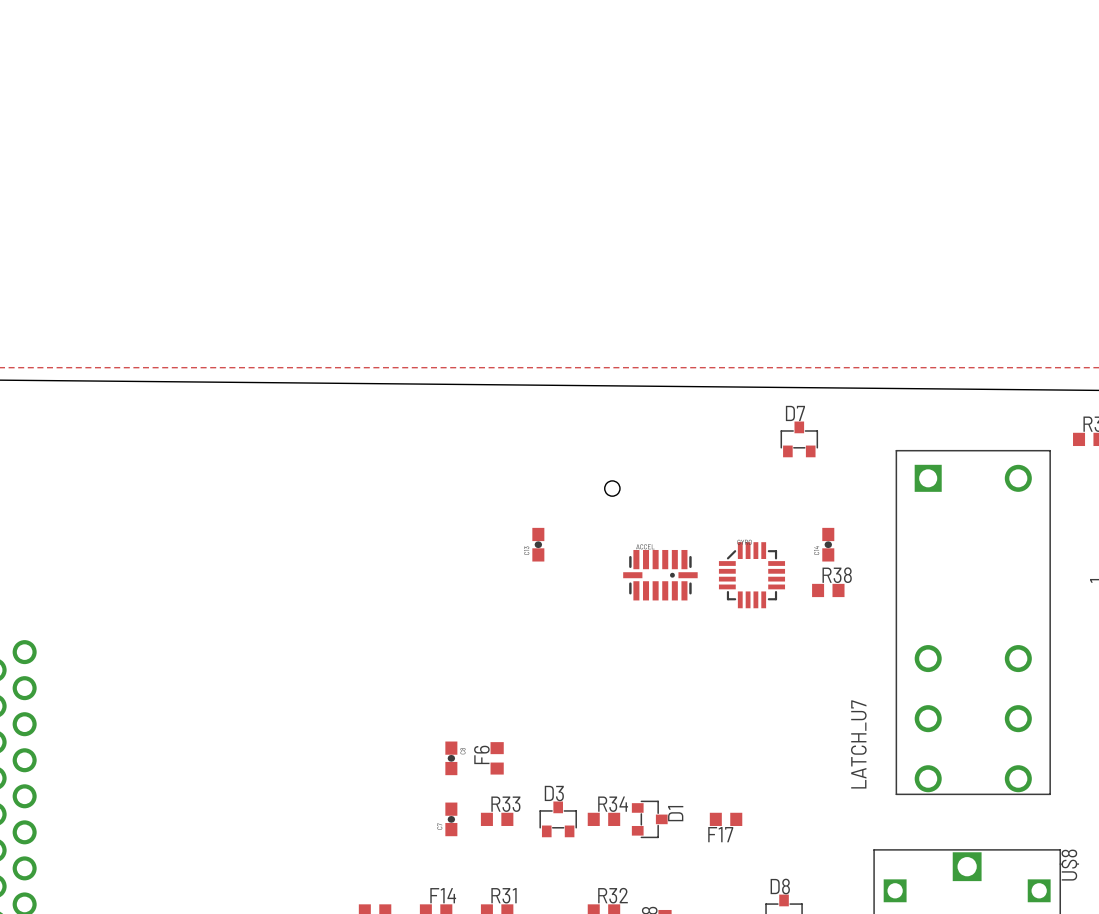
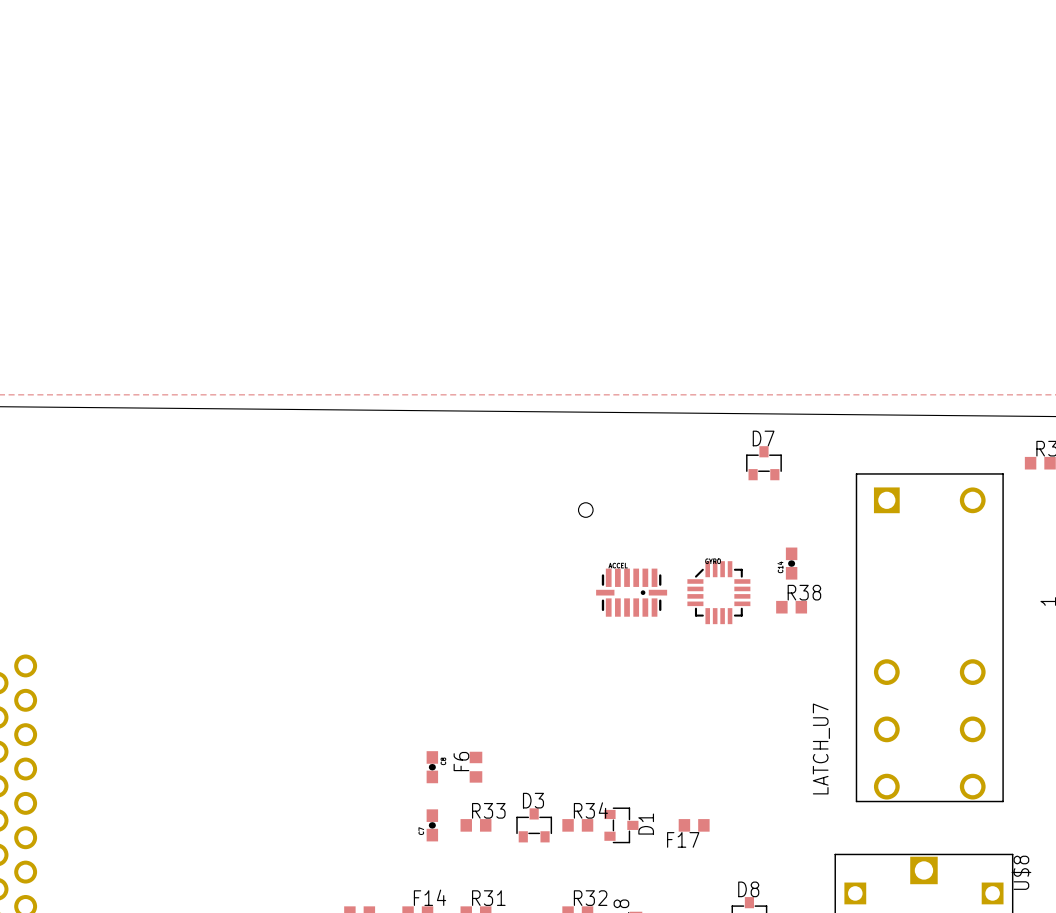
part: (538, 544) -> none

